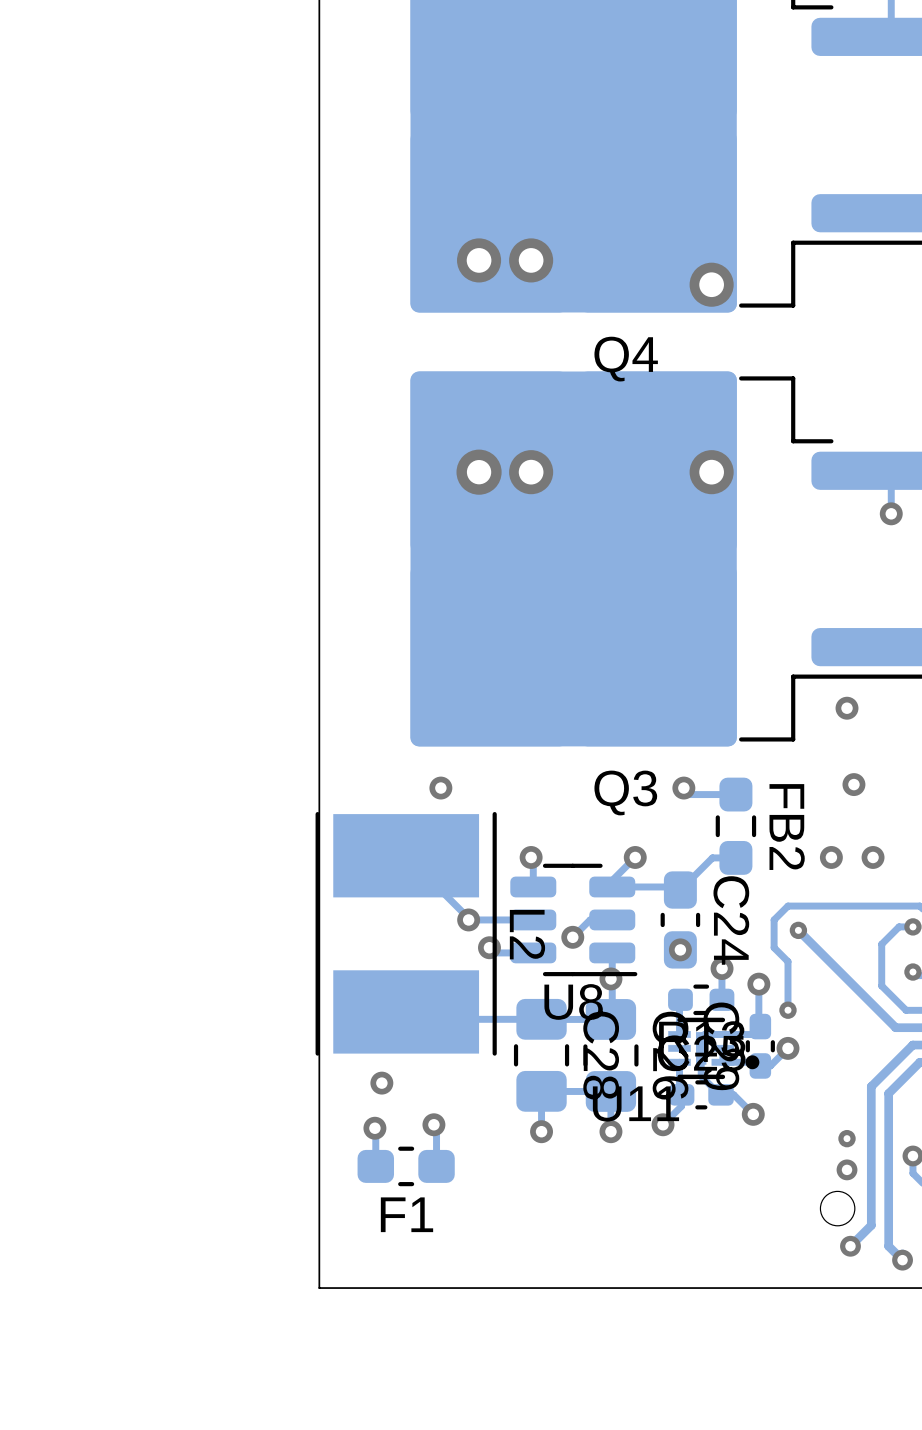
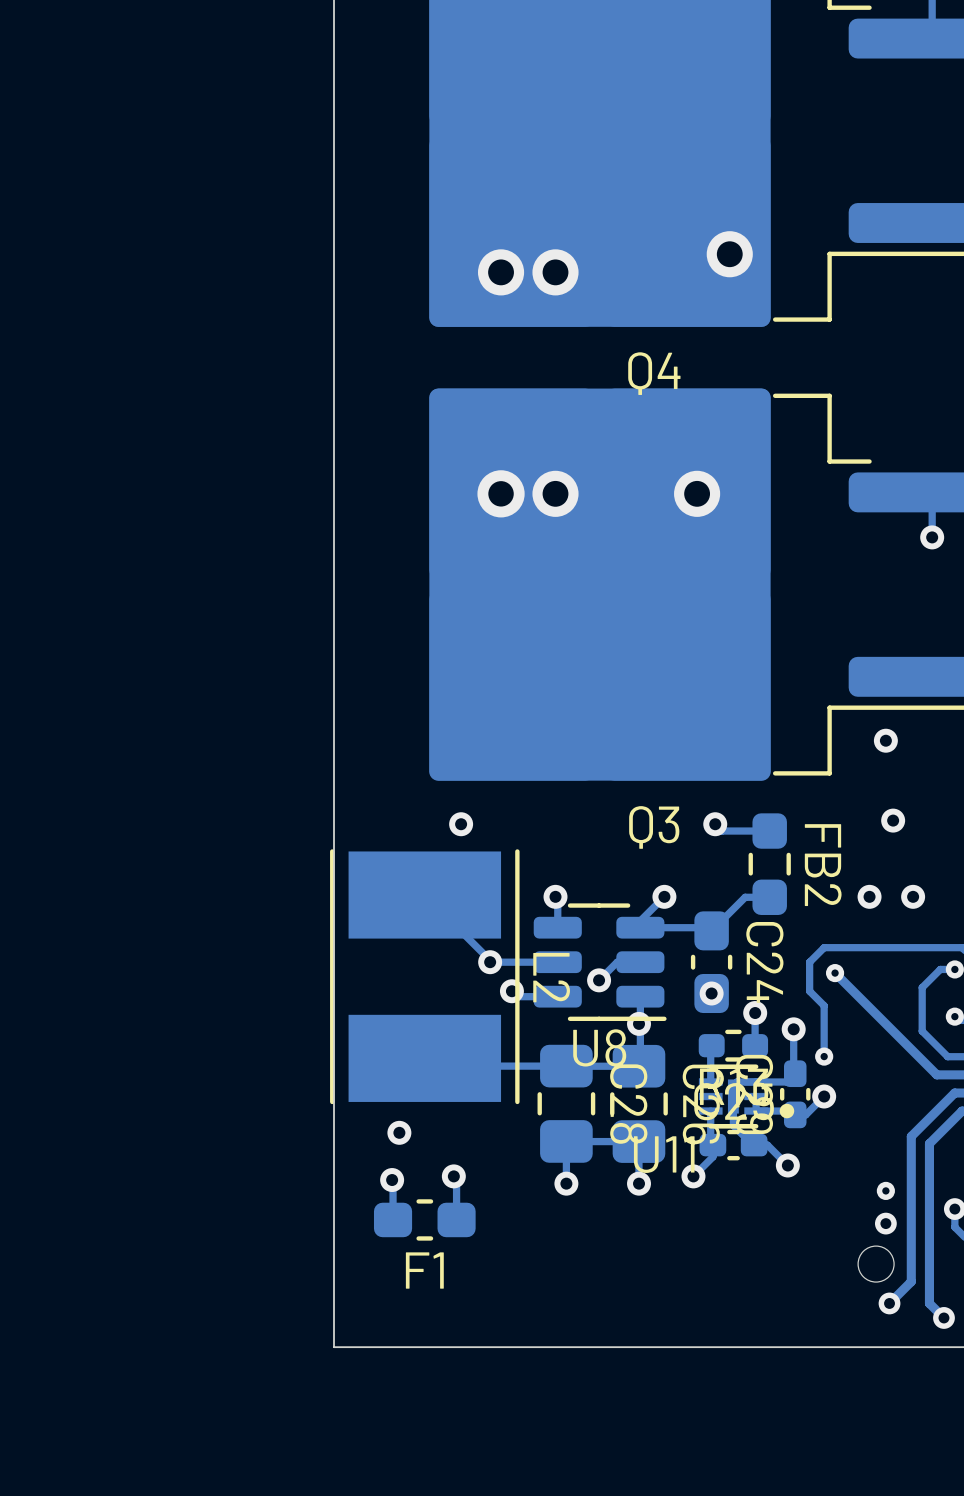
via position: (711, 284) -> (729, 254)
via position: (711, 472) -> (697, 493)

